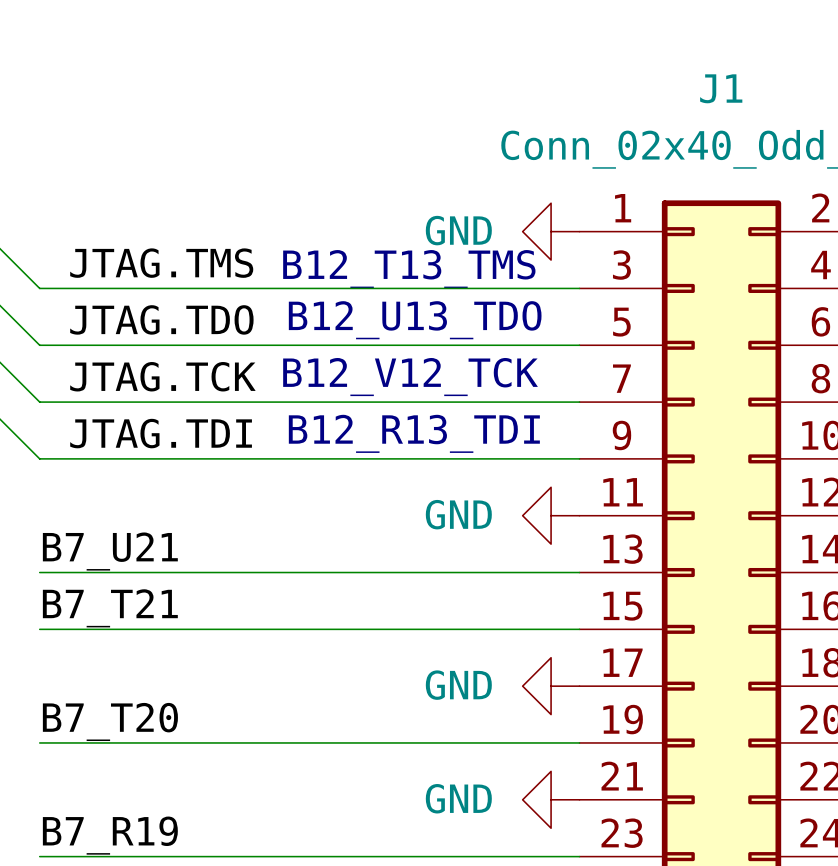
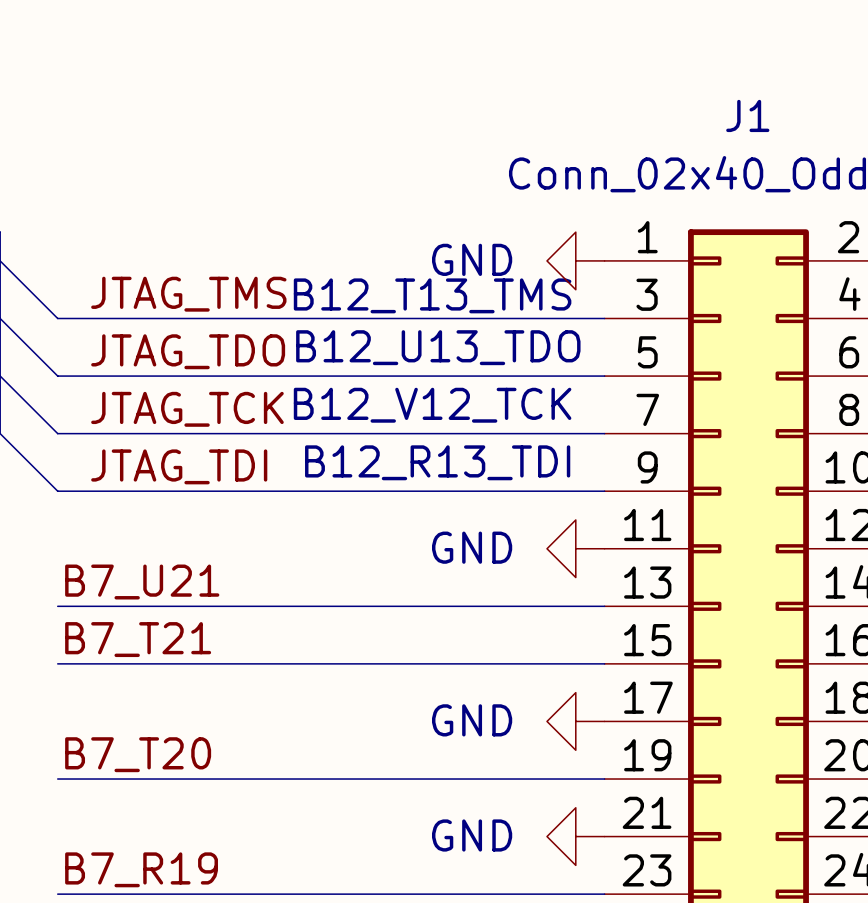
label: JTAG.TMS (161, 263) -> JTAG_TMS (188, 294)
label: JTAG.TDO (161, 319) -> JTAG_TDO (188, 351)
label: JTAG.TCK (162, 376) -> JTAG_TCK (187, 409)
label: JTAG.TDI (161, 433) -> JTAG_TDI (179, 466)

